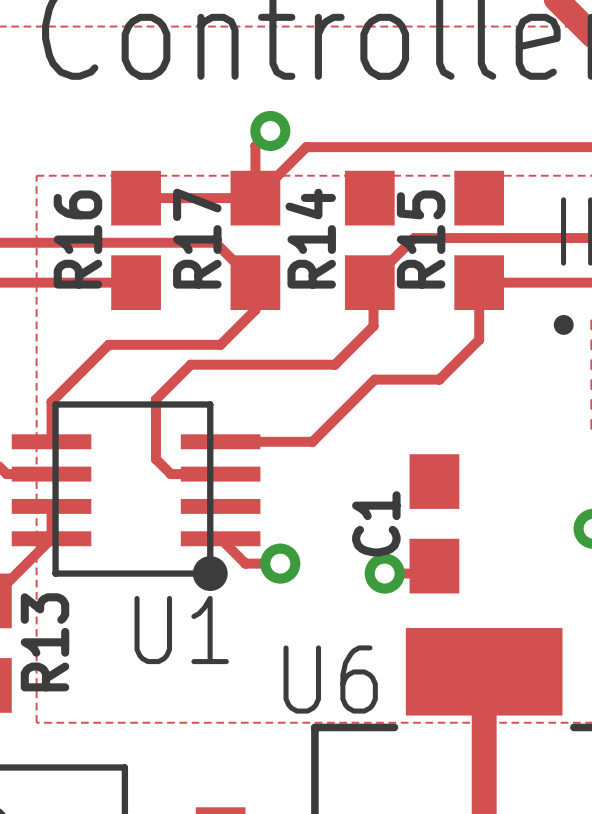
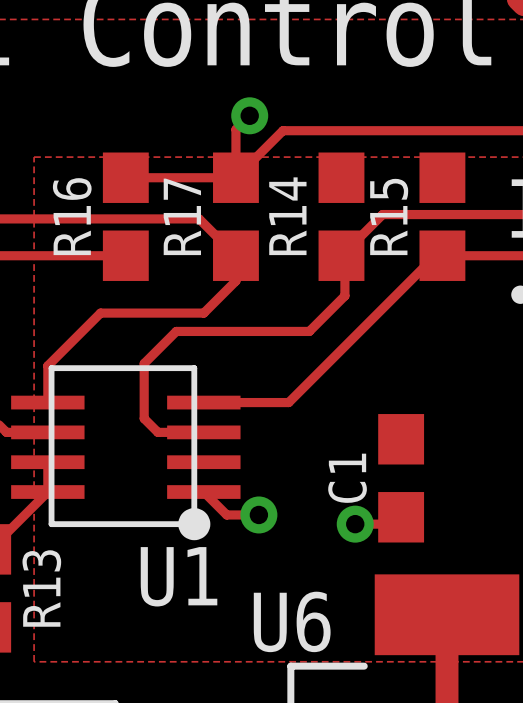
track: (479, 282) (479, 339) (439, 379) (374, 379) -> (442, 255) (435, 255) (346, 345)

